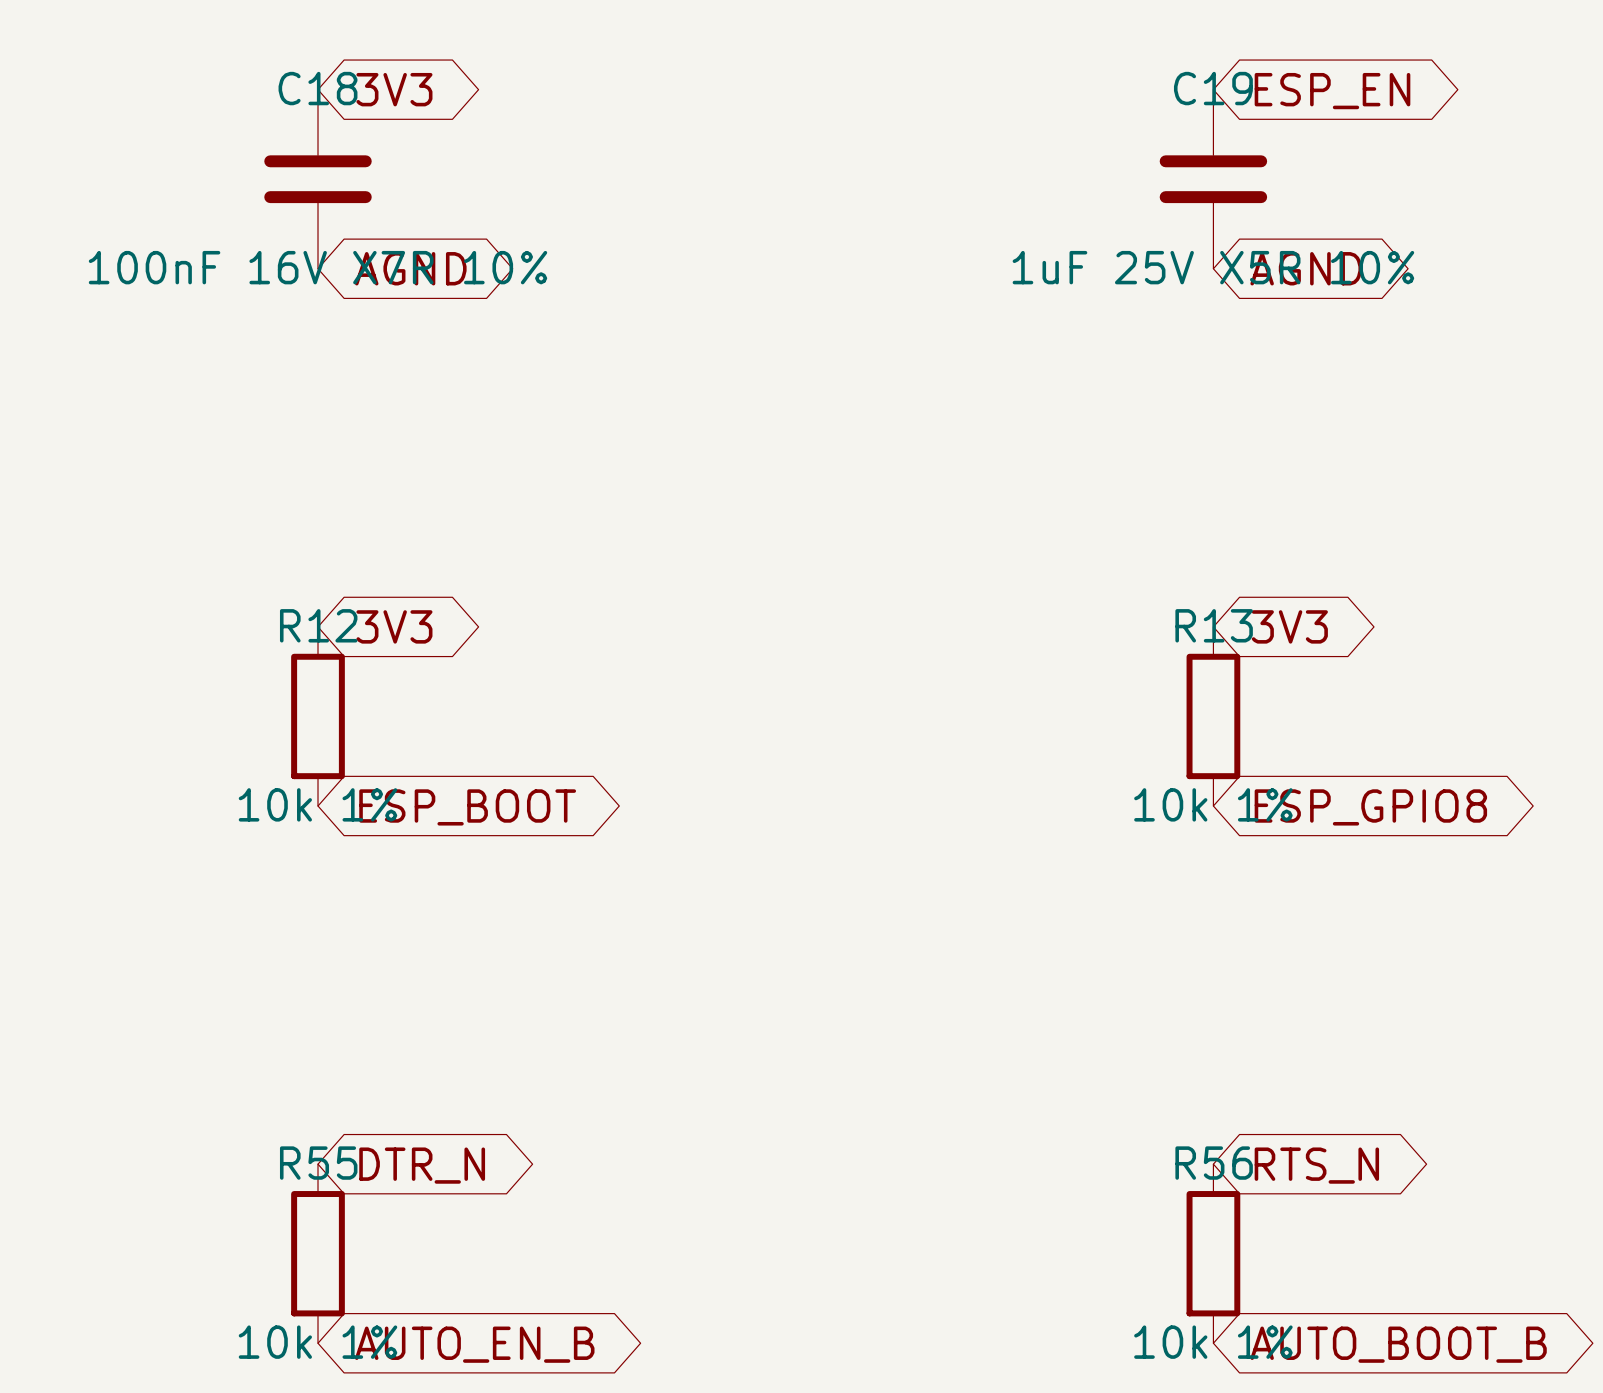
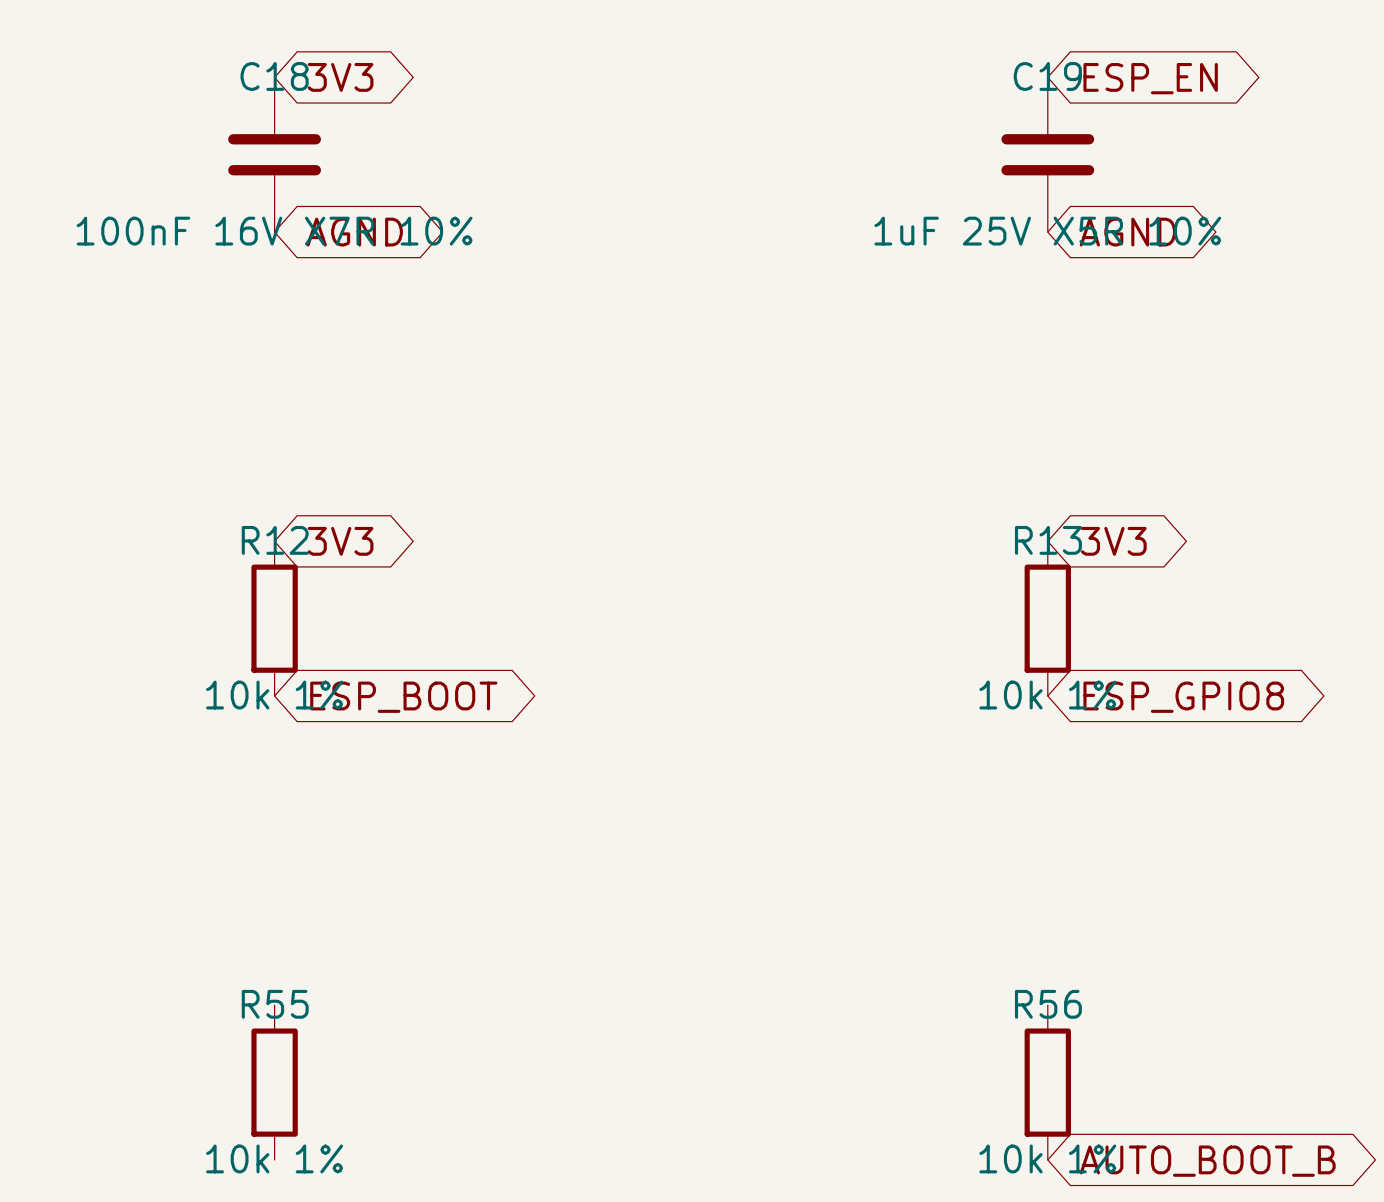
global label: DTR_N (422, 1165) -> none
global label: RTS_N (1316, 1165) -> none
global label: AUTO_EN_B (474, 1344) -> none

